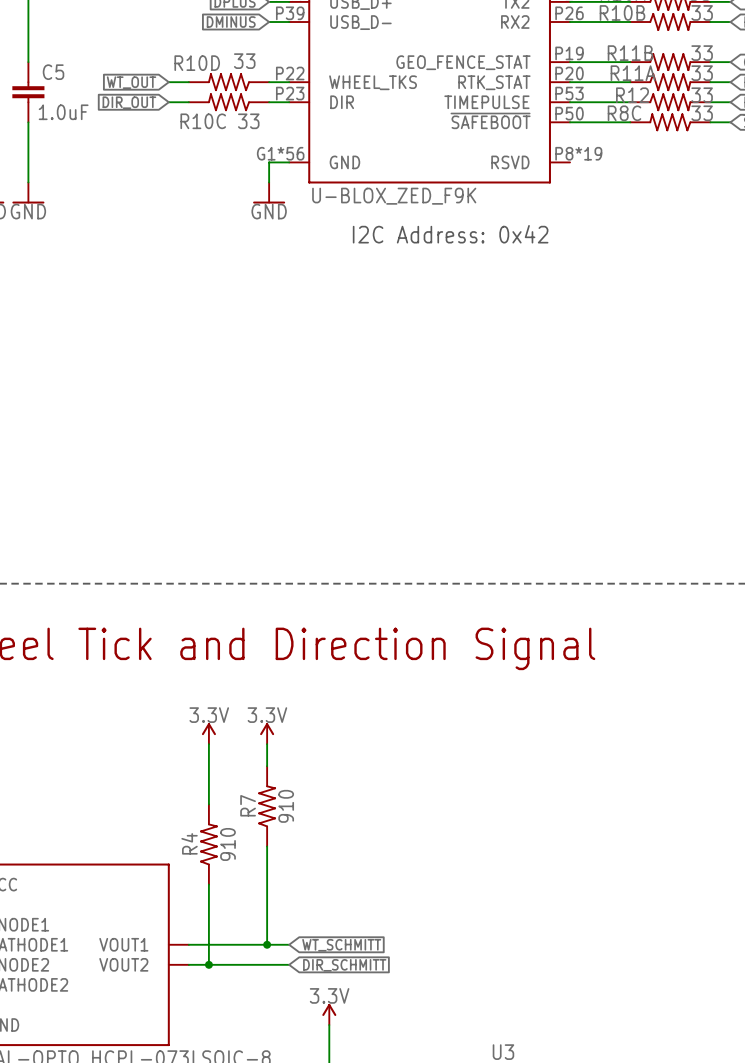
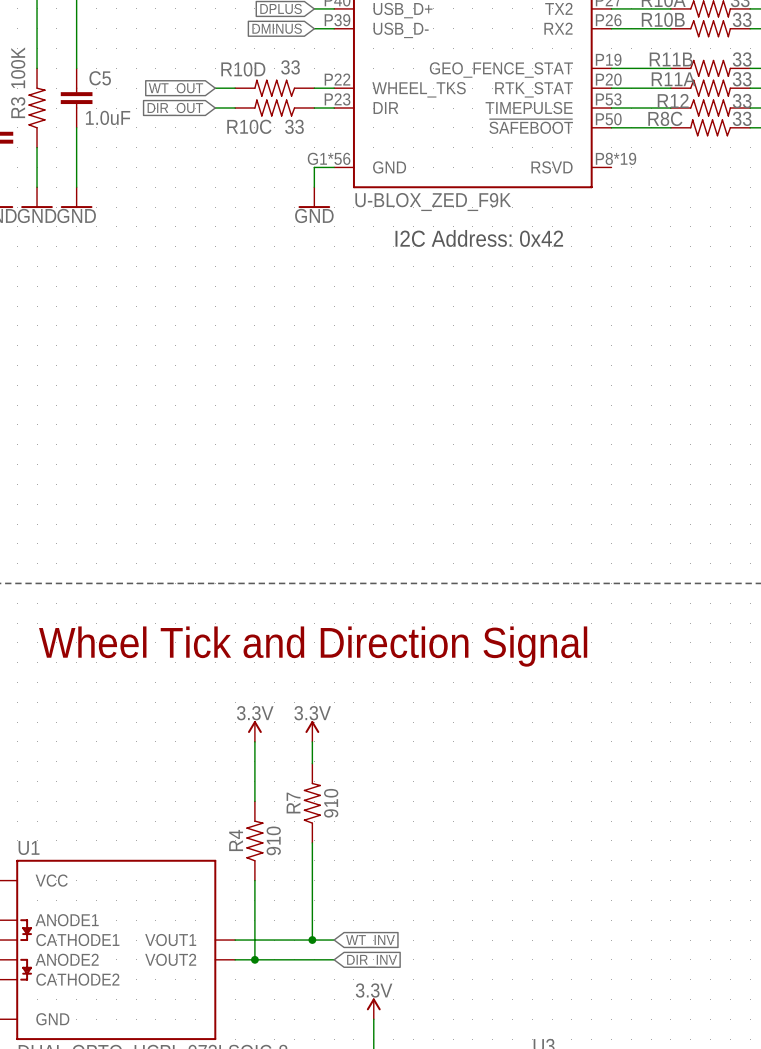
global label: WT_SCHMITT (341, 945) -> WT_INV (370, 941)
global label: DIR_SCHMITT (344, 965) -> DIR_INV (372, 961)

